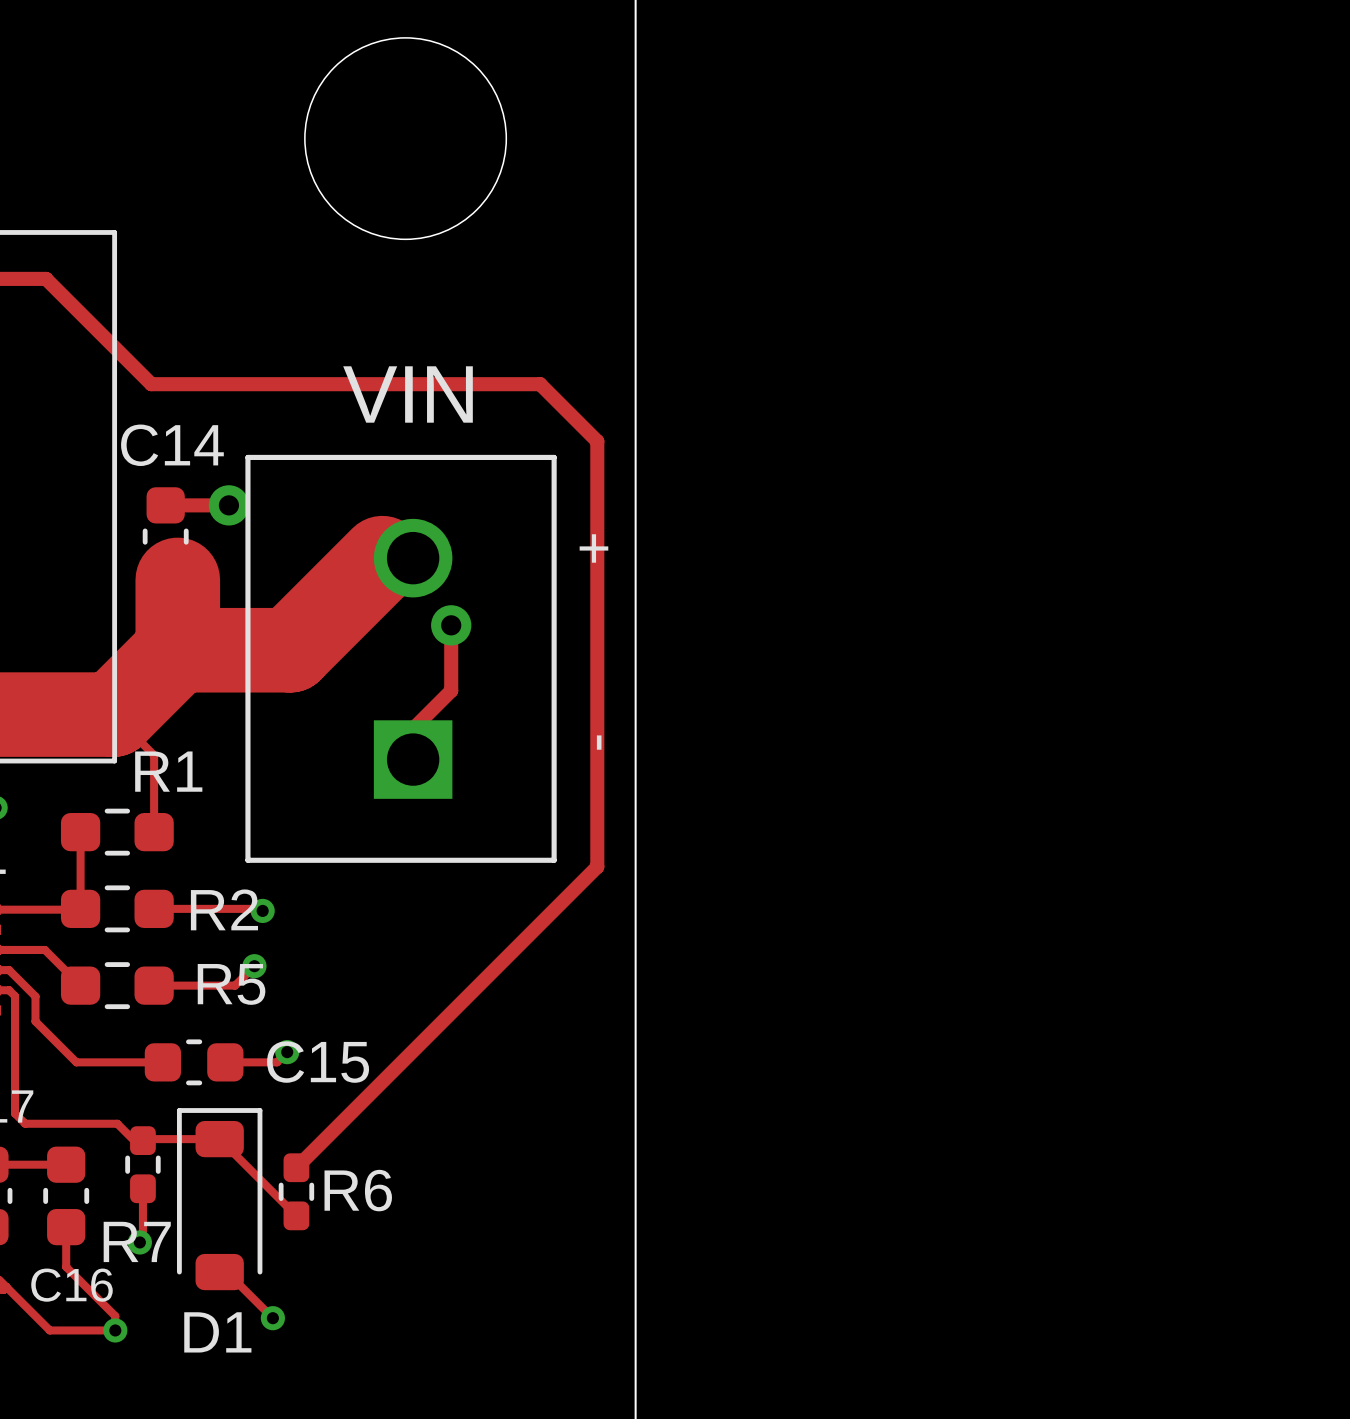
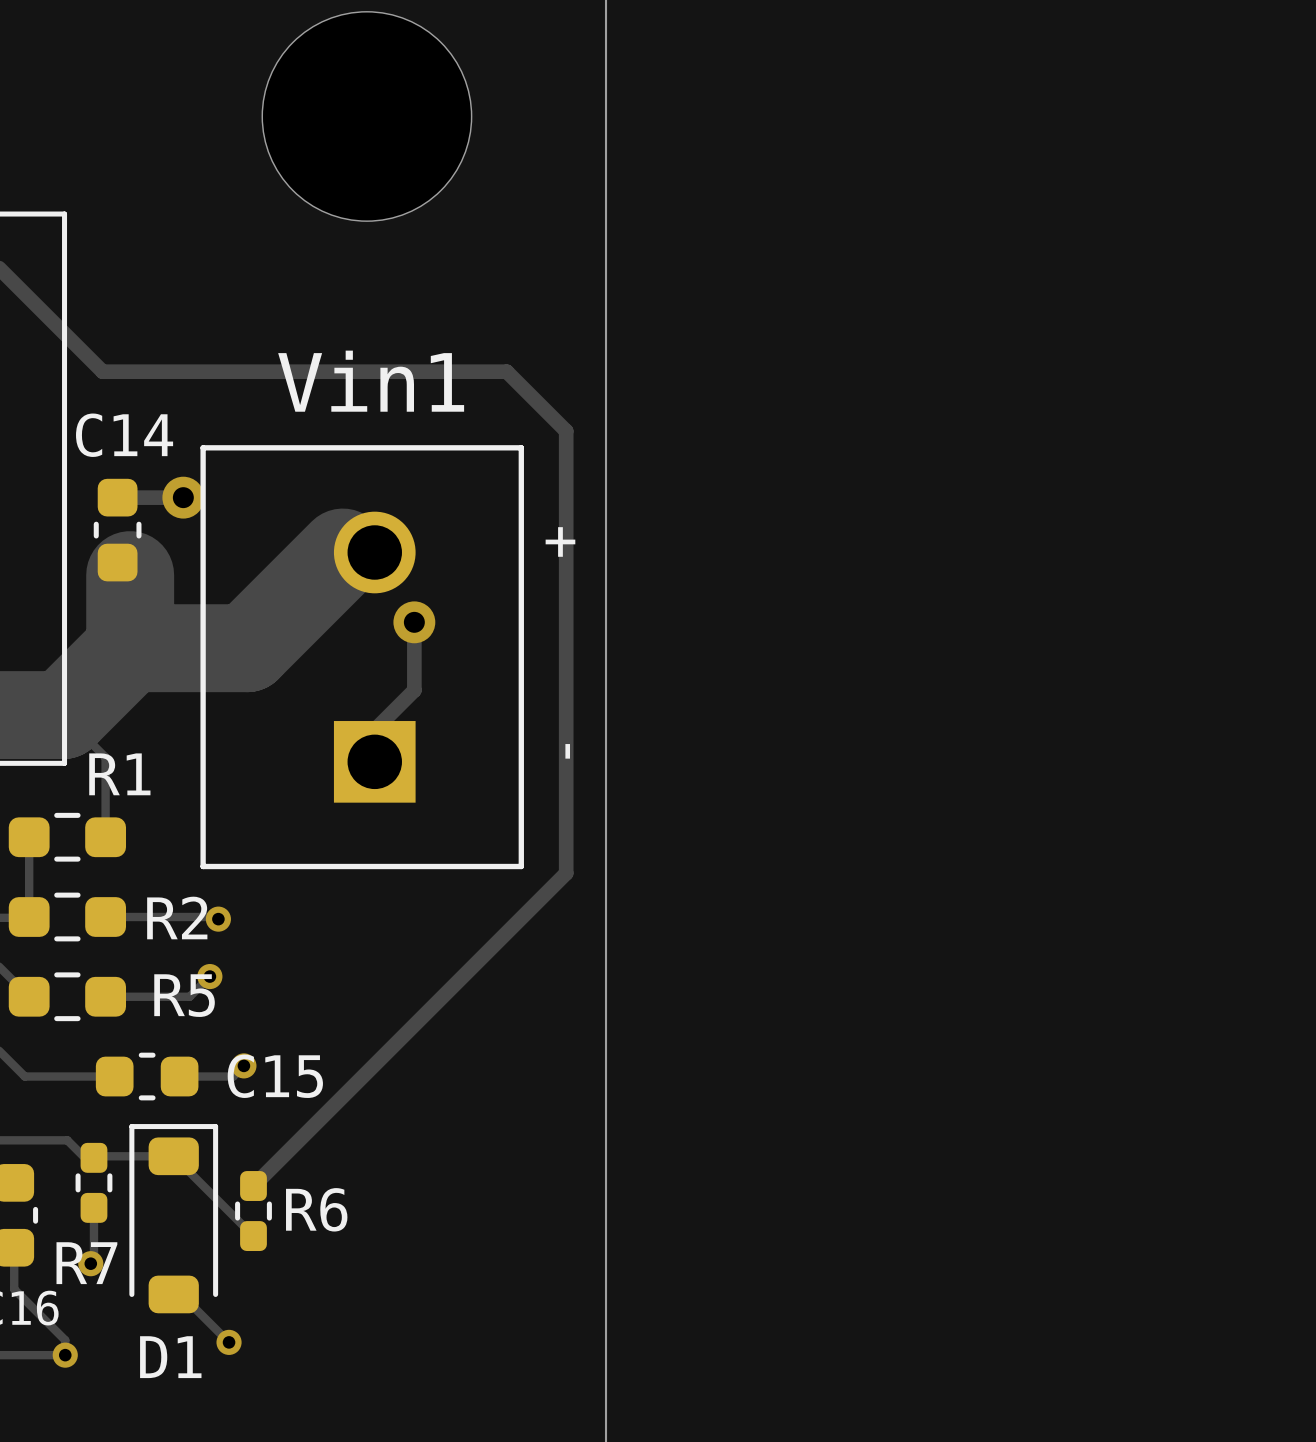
VIN name: VIN (408, 394) -> Vin1 (371, 381)

